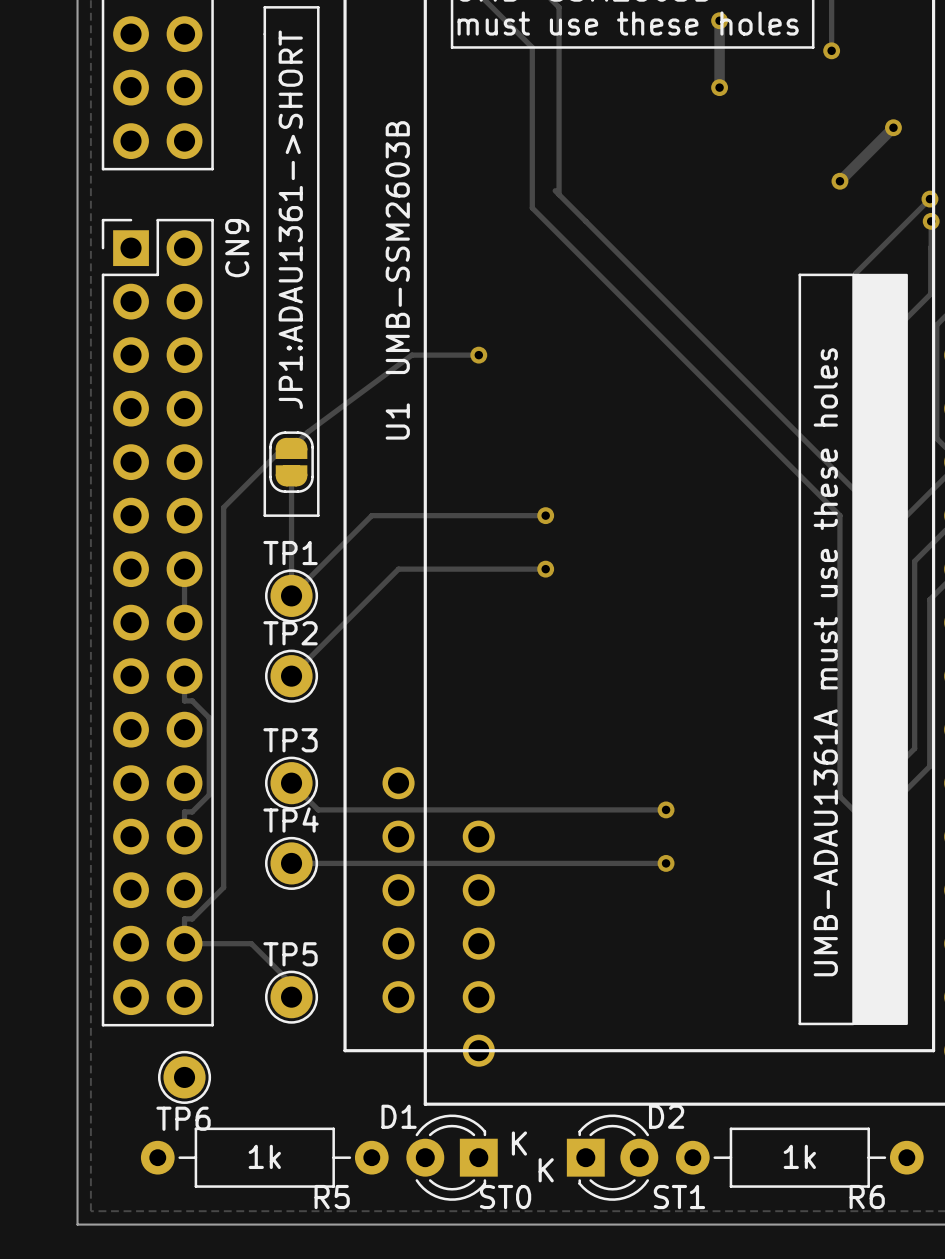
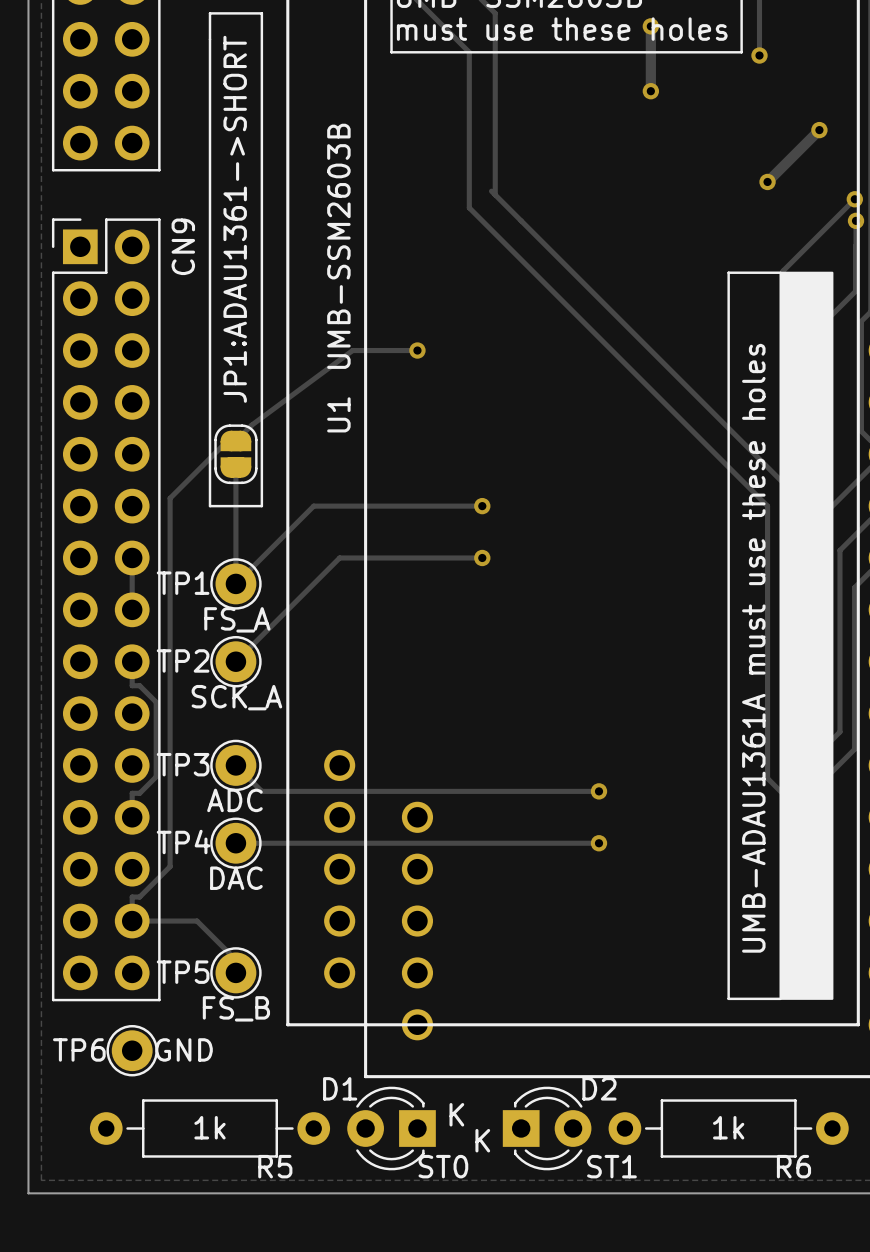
TP1 name position: TP1 (290, 553) -> TP1 (183, 583)
TP1 value: none -> FS_A (237, 619)
TP2 name position: TP2 (290, 633) -> TP2 (183, 660)
TP2 value: none -> SCK_A (236, 697)
TP3 name position: TP3 (290, 740) -> TP3 (183, 764)
TP3 value: none -> ADC (234, 800)
TP4 name position: TP4 (291, 820) -> TP4 (183, 842)
TP4 value: none -> DAC (236, 878)
TP5 name position: TP5 (290, 954) -> TP5 (183, 972)
TP5 value: none -> FS_B (236, 1008)
TP6 value: none -> GND (184, 1049)
TP6 name position: TP6 (183, 1118) -> TP6 (79, 1049)

